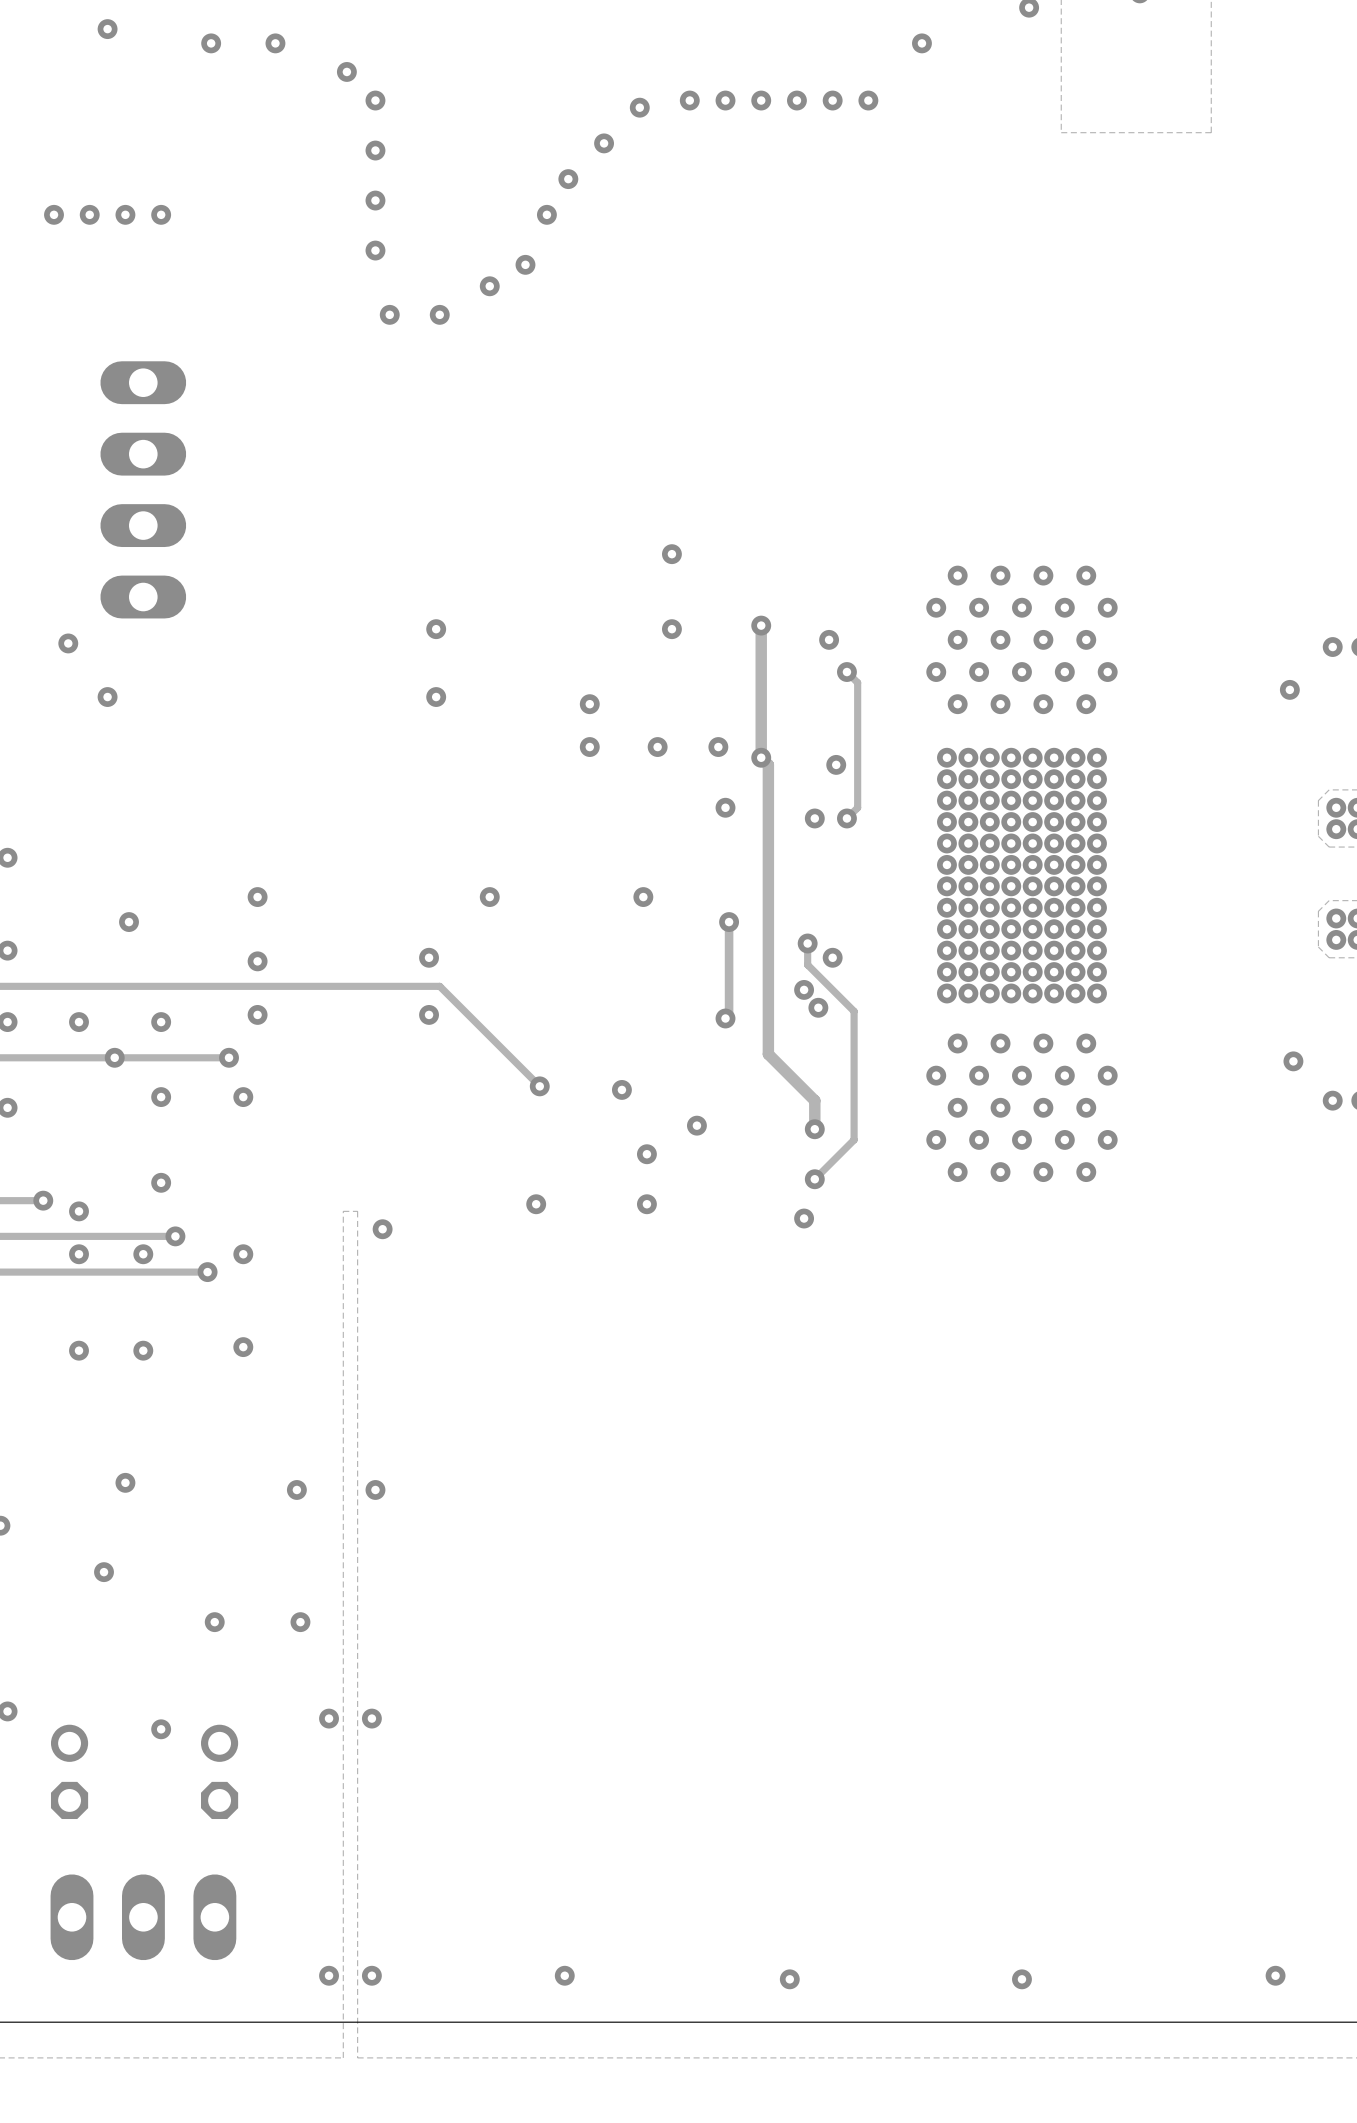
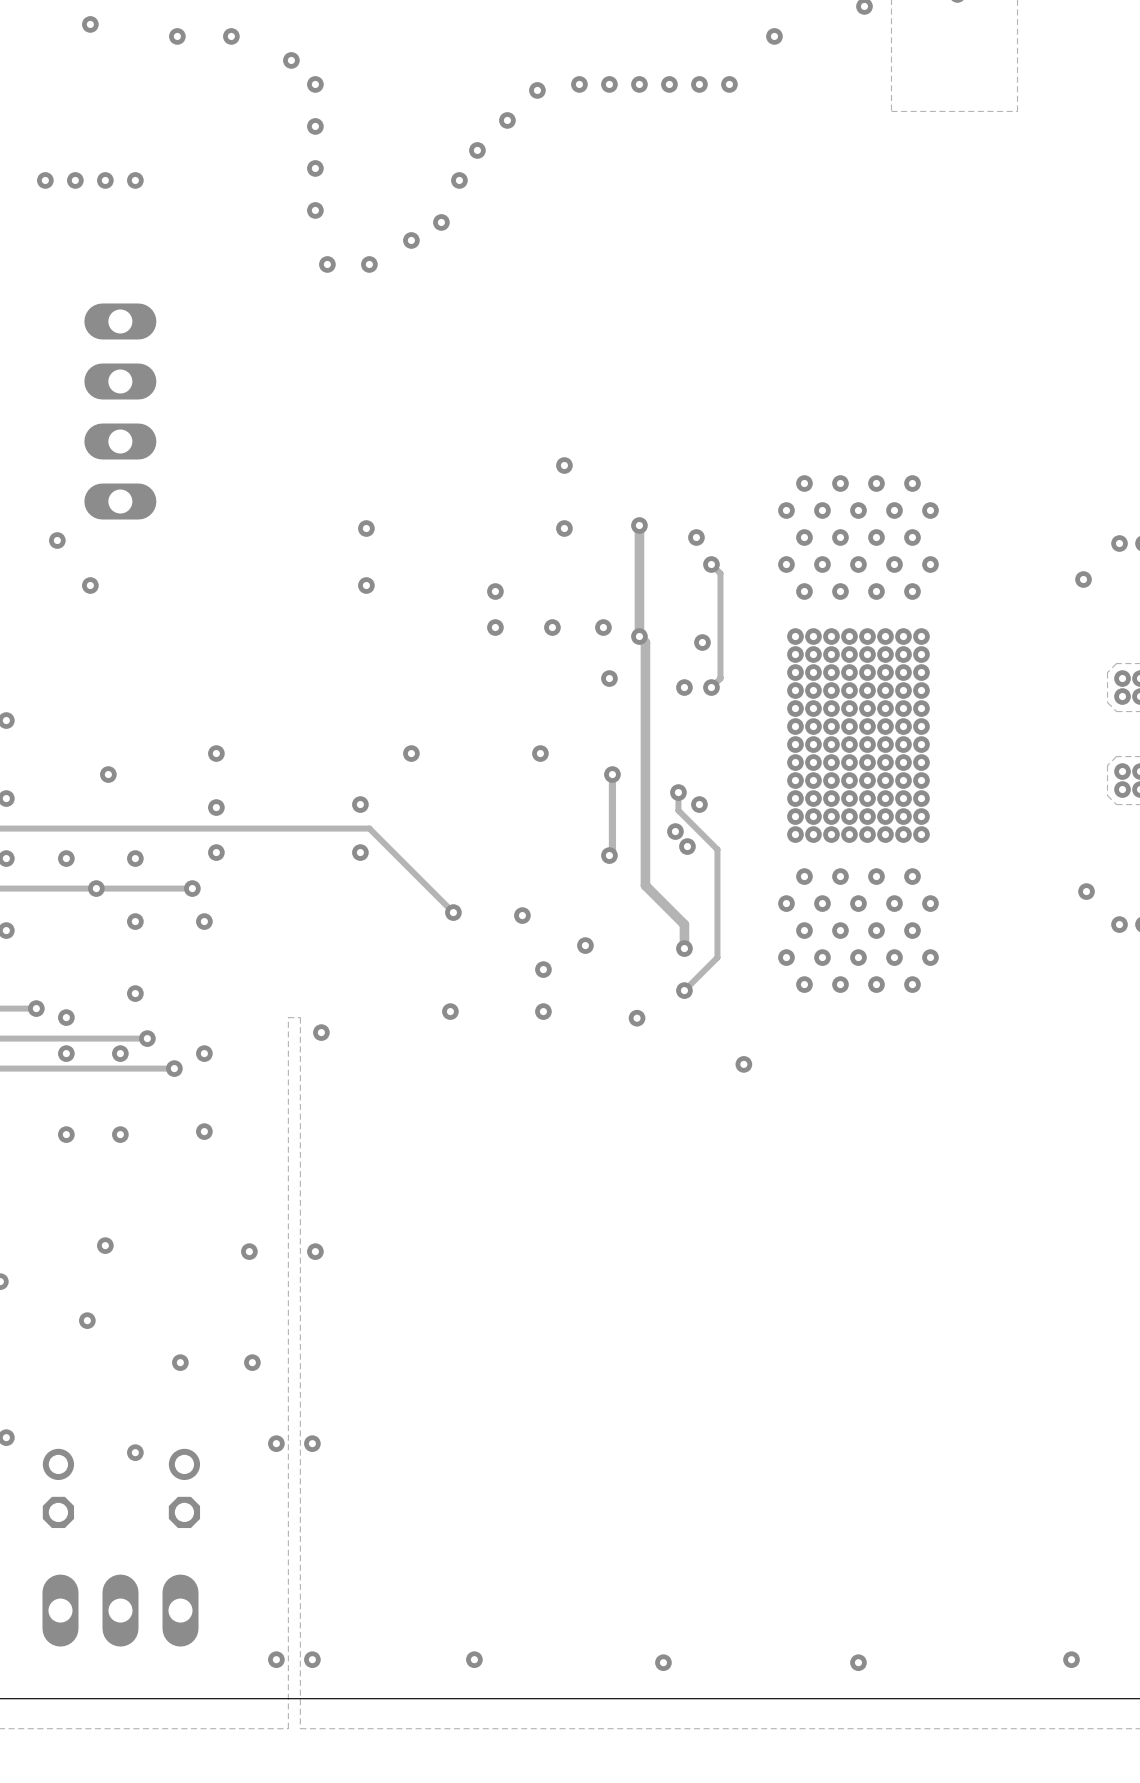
via position: (804, 1218) -> (637, 1018)
via: none -> (743, 1064)

